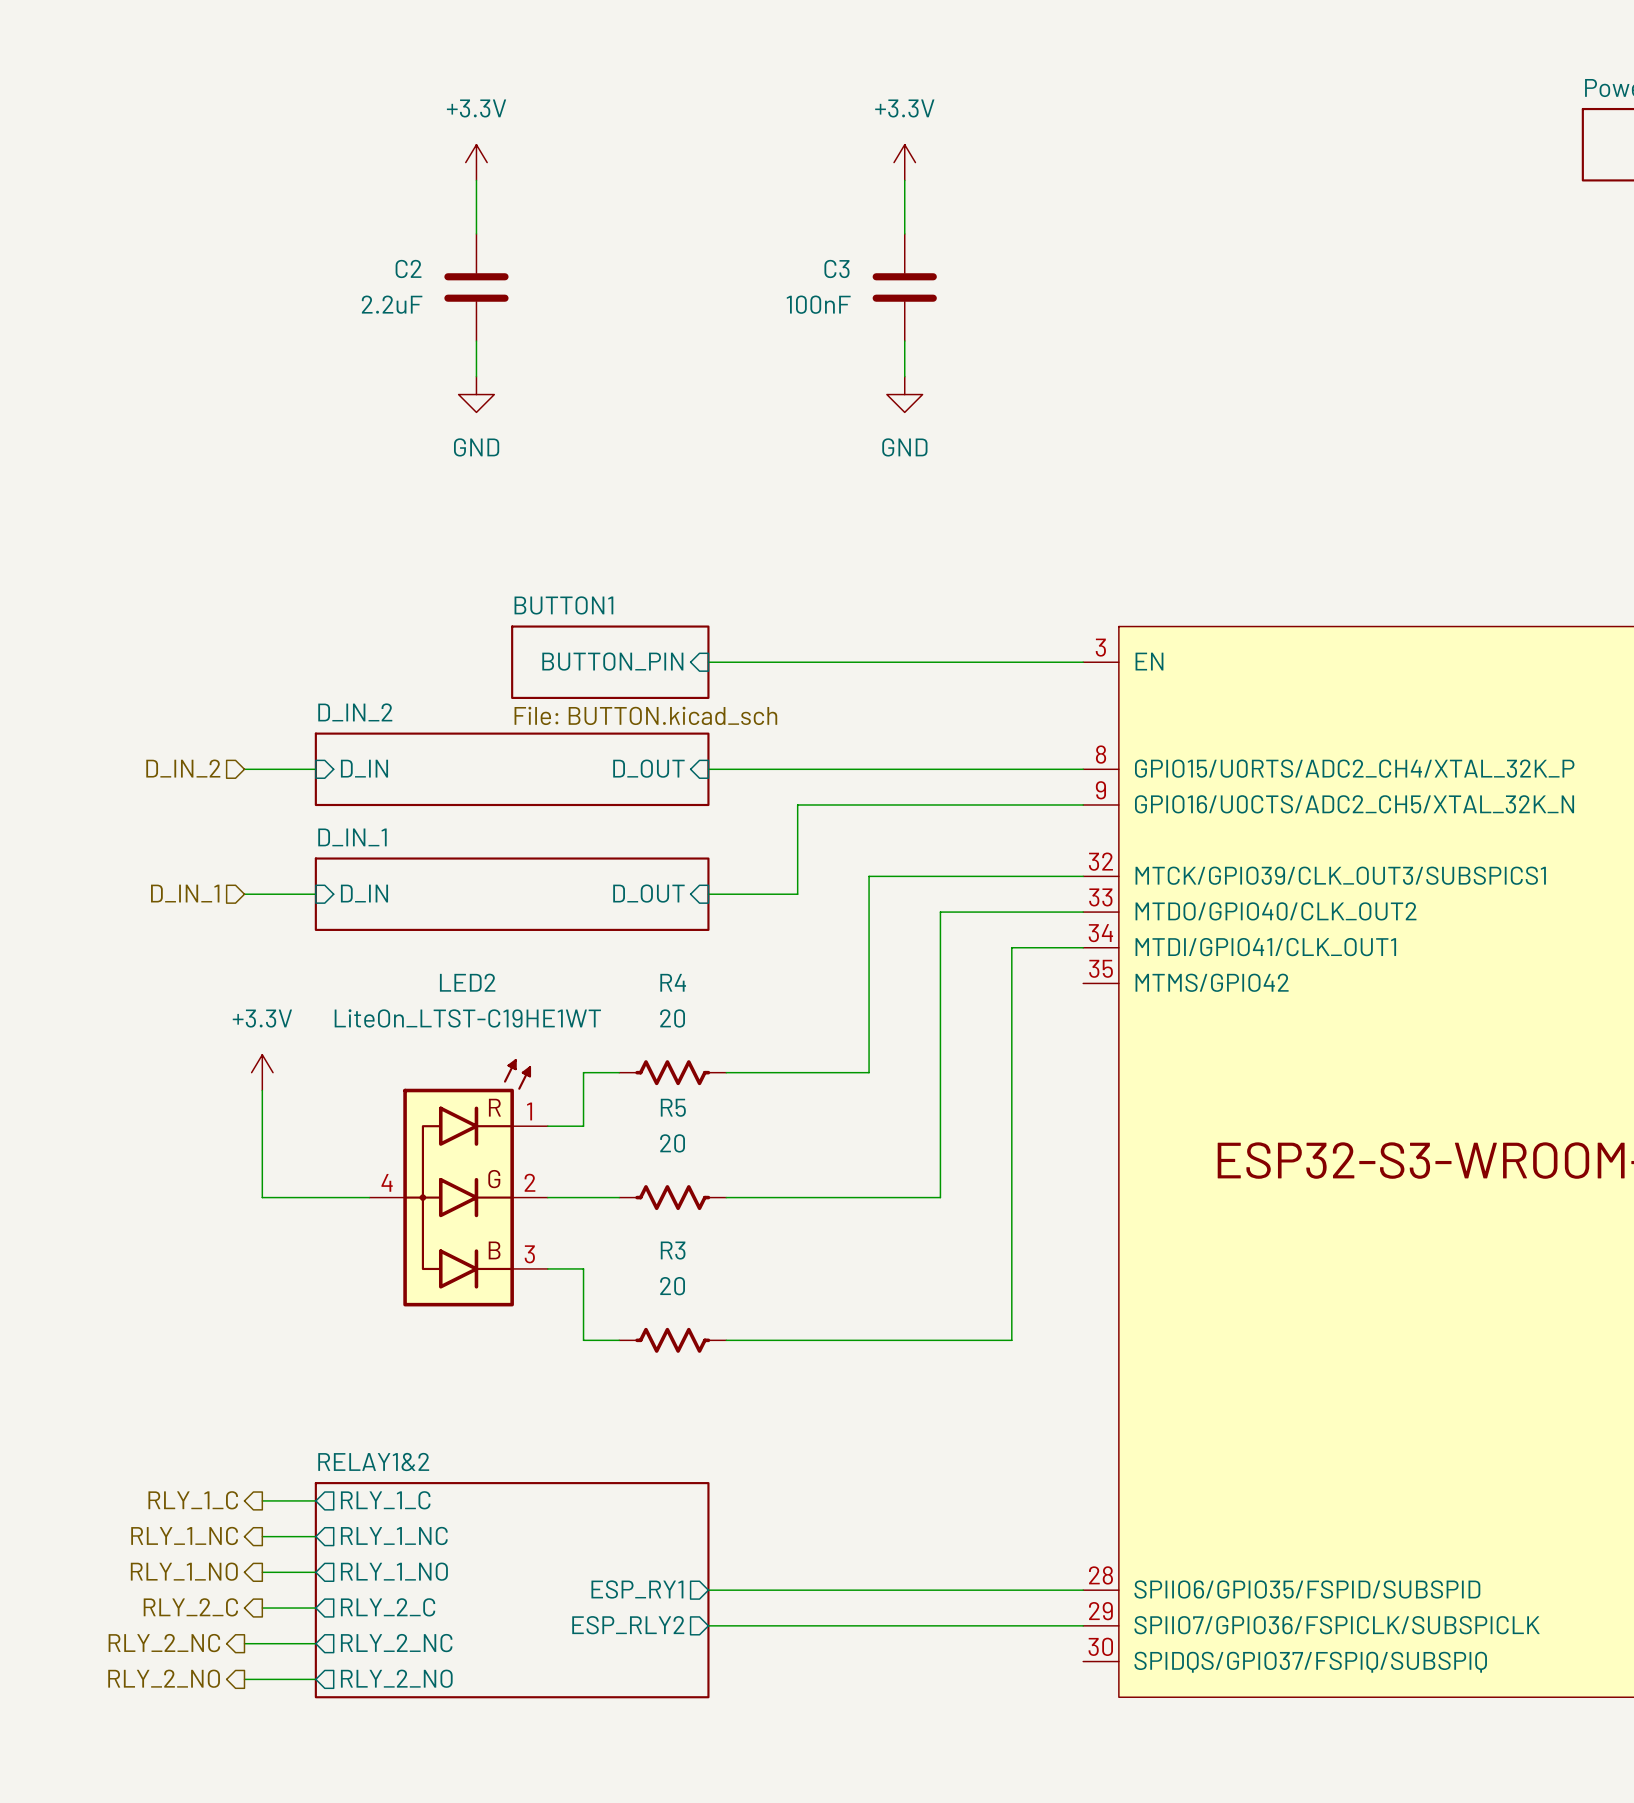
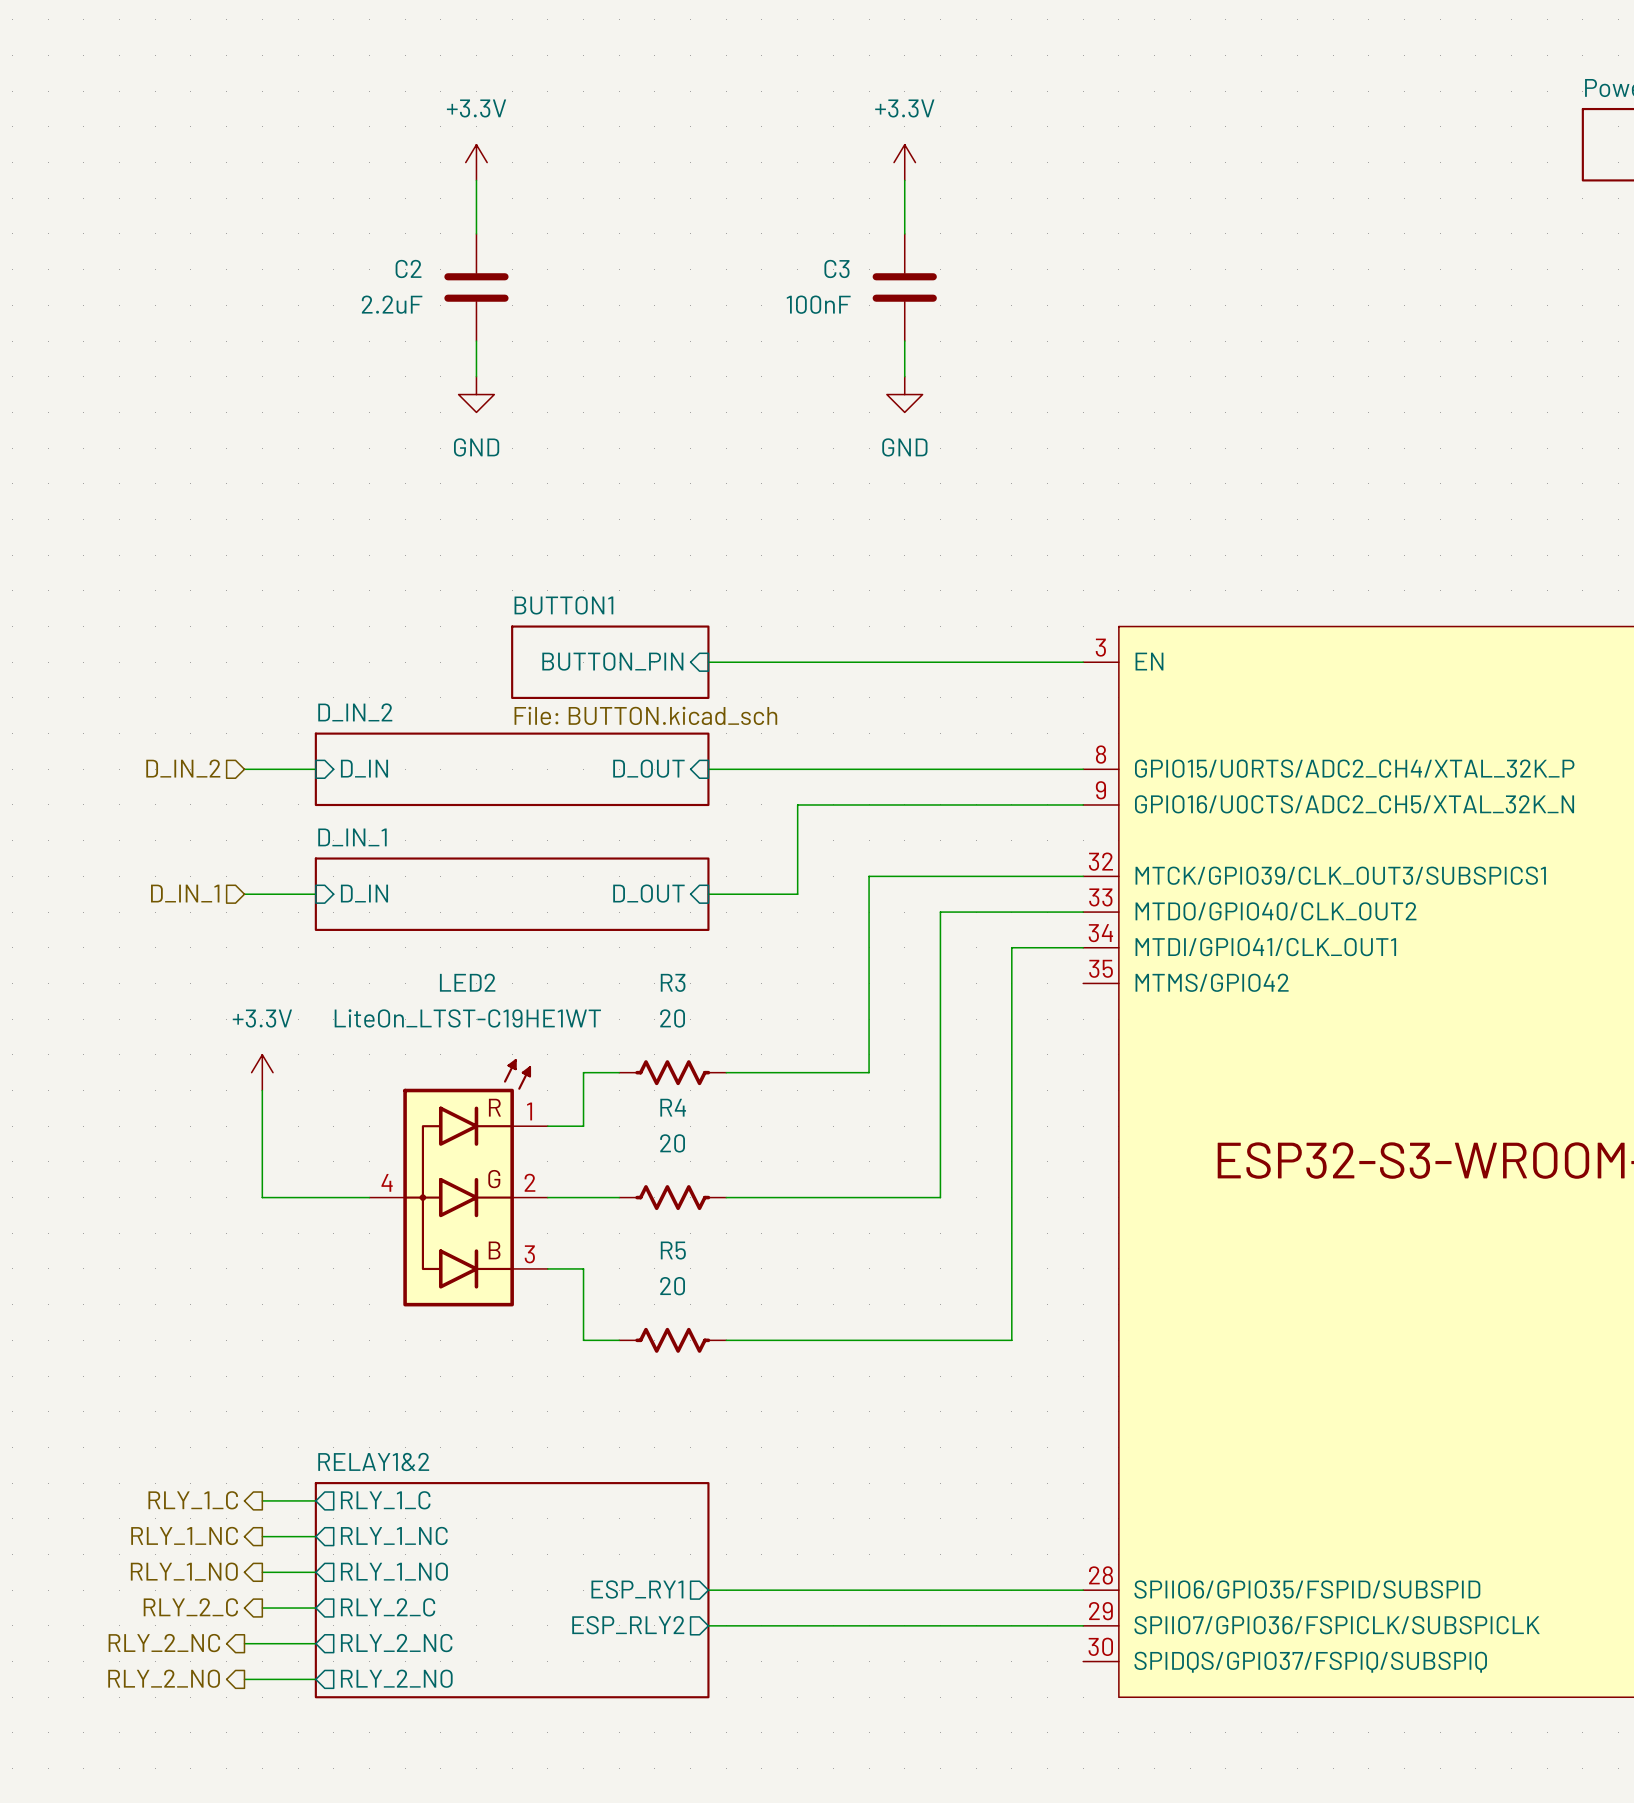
R4 name: R4 (673, 982) -> R3 (673, 982)
R5 name: R5 (673, 1107) -> R4 (673, 1107)
R3 name: R3 (673, 1250) -> R5 (673, 1250)

